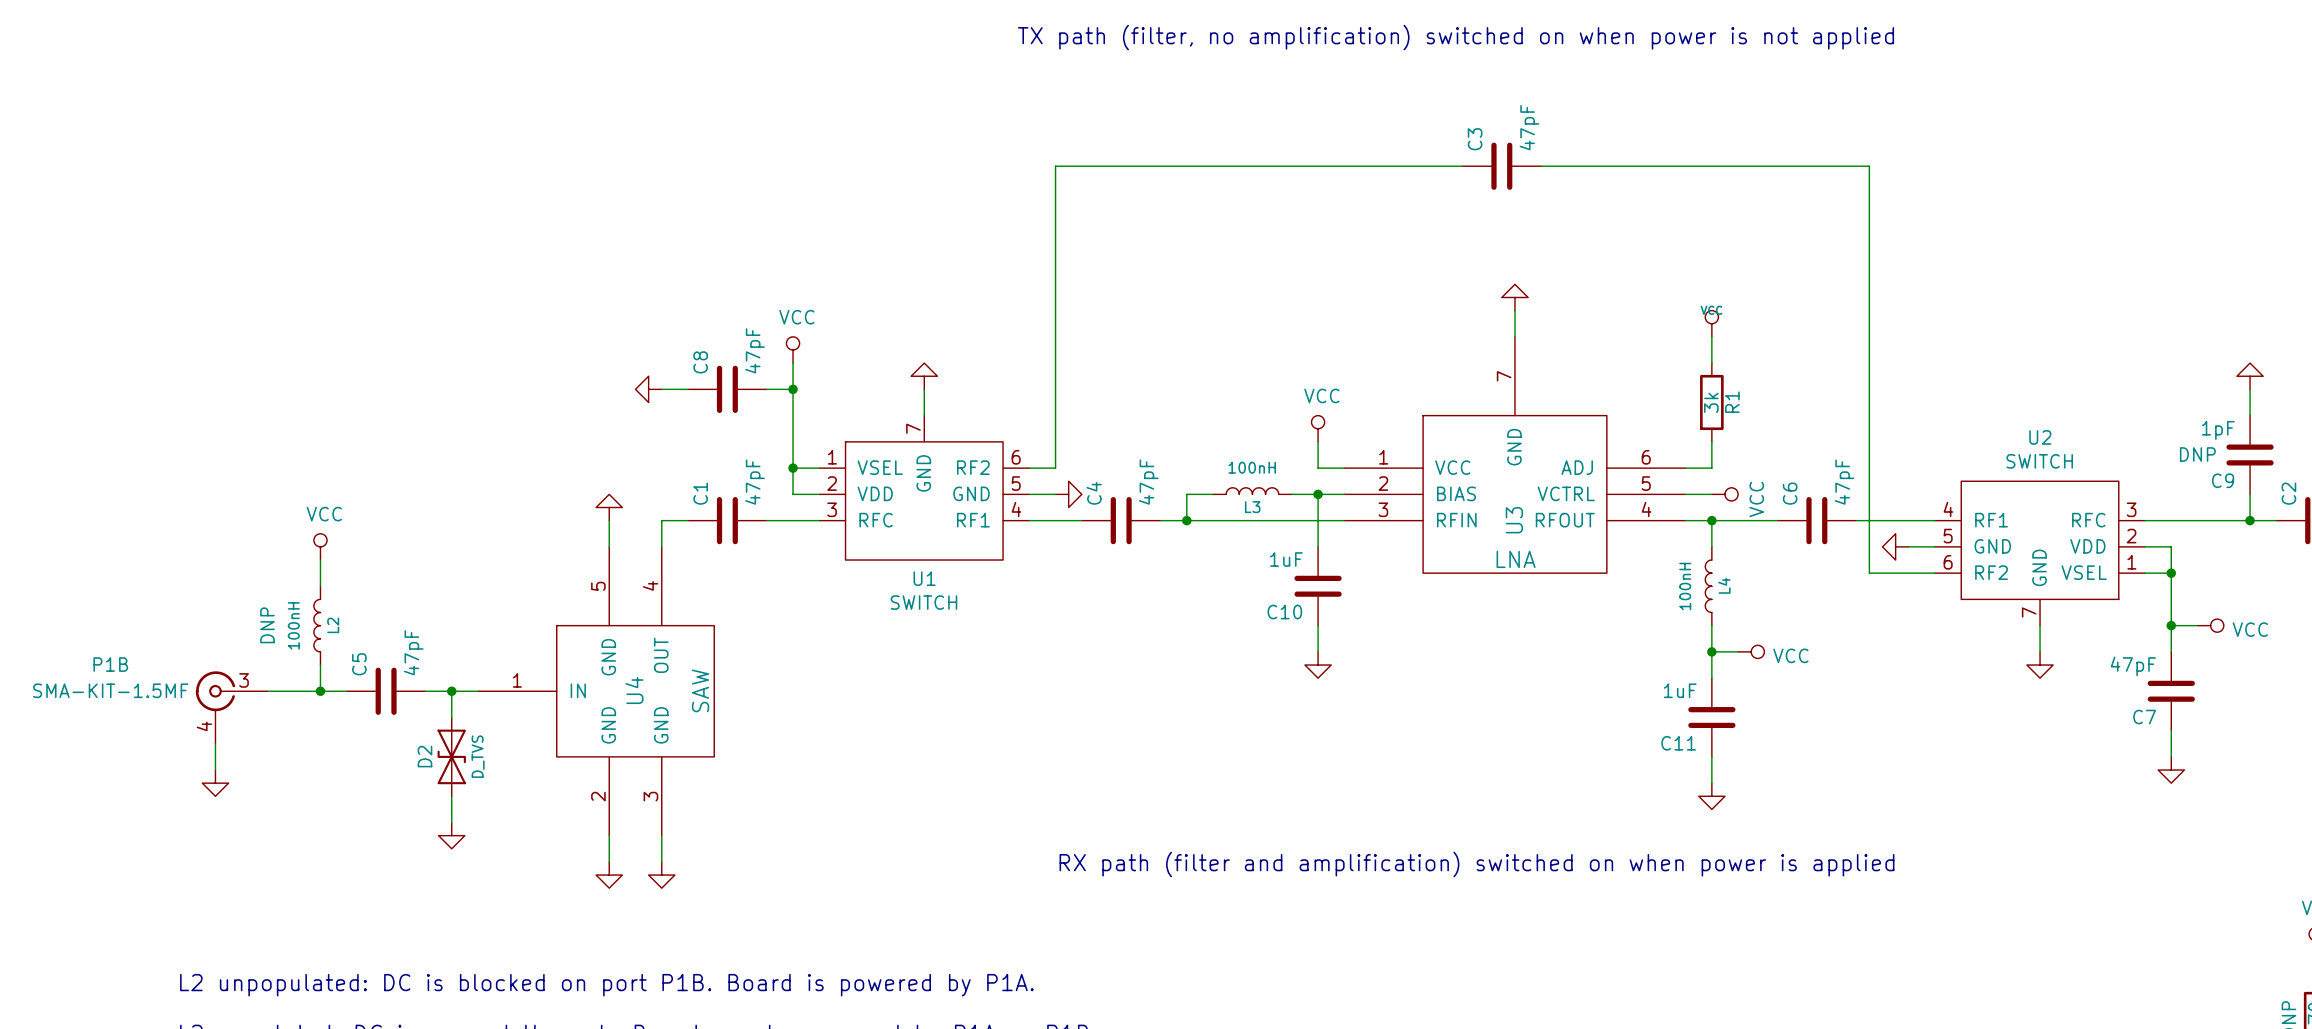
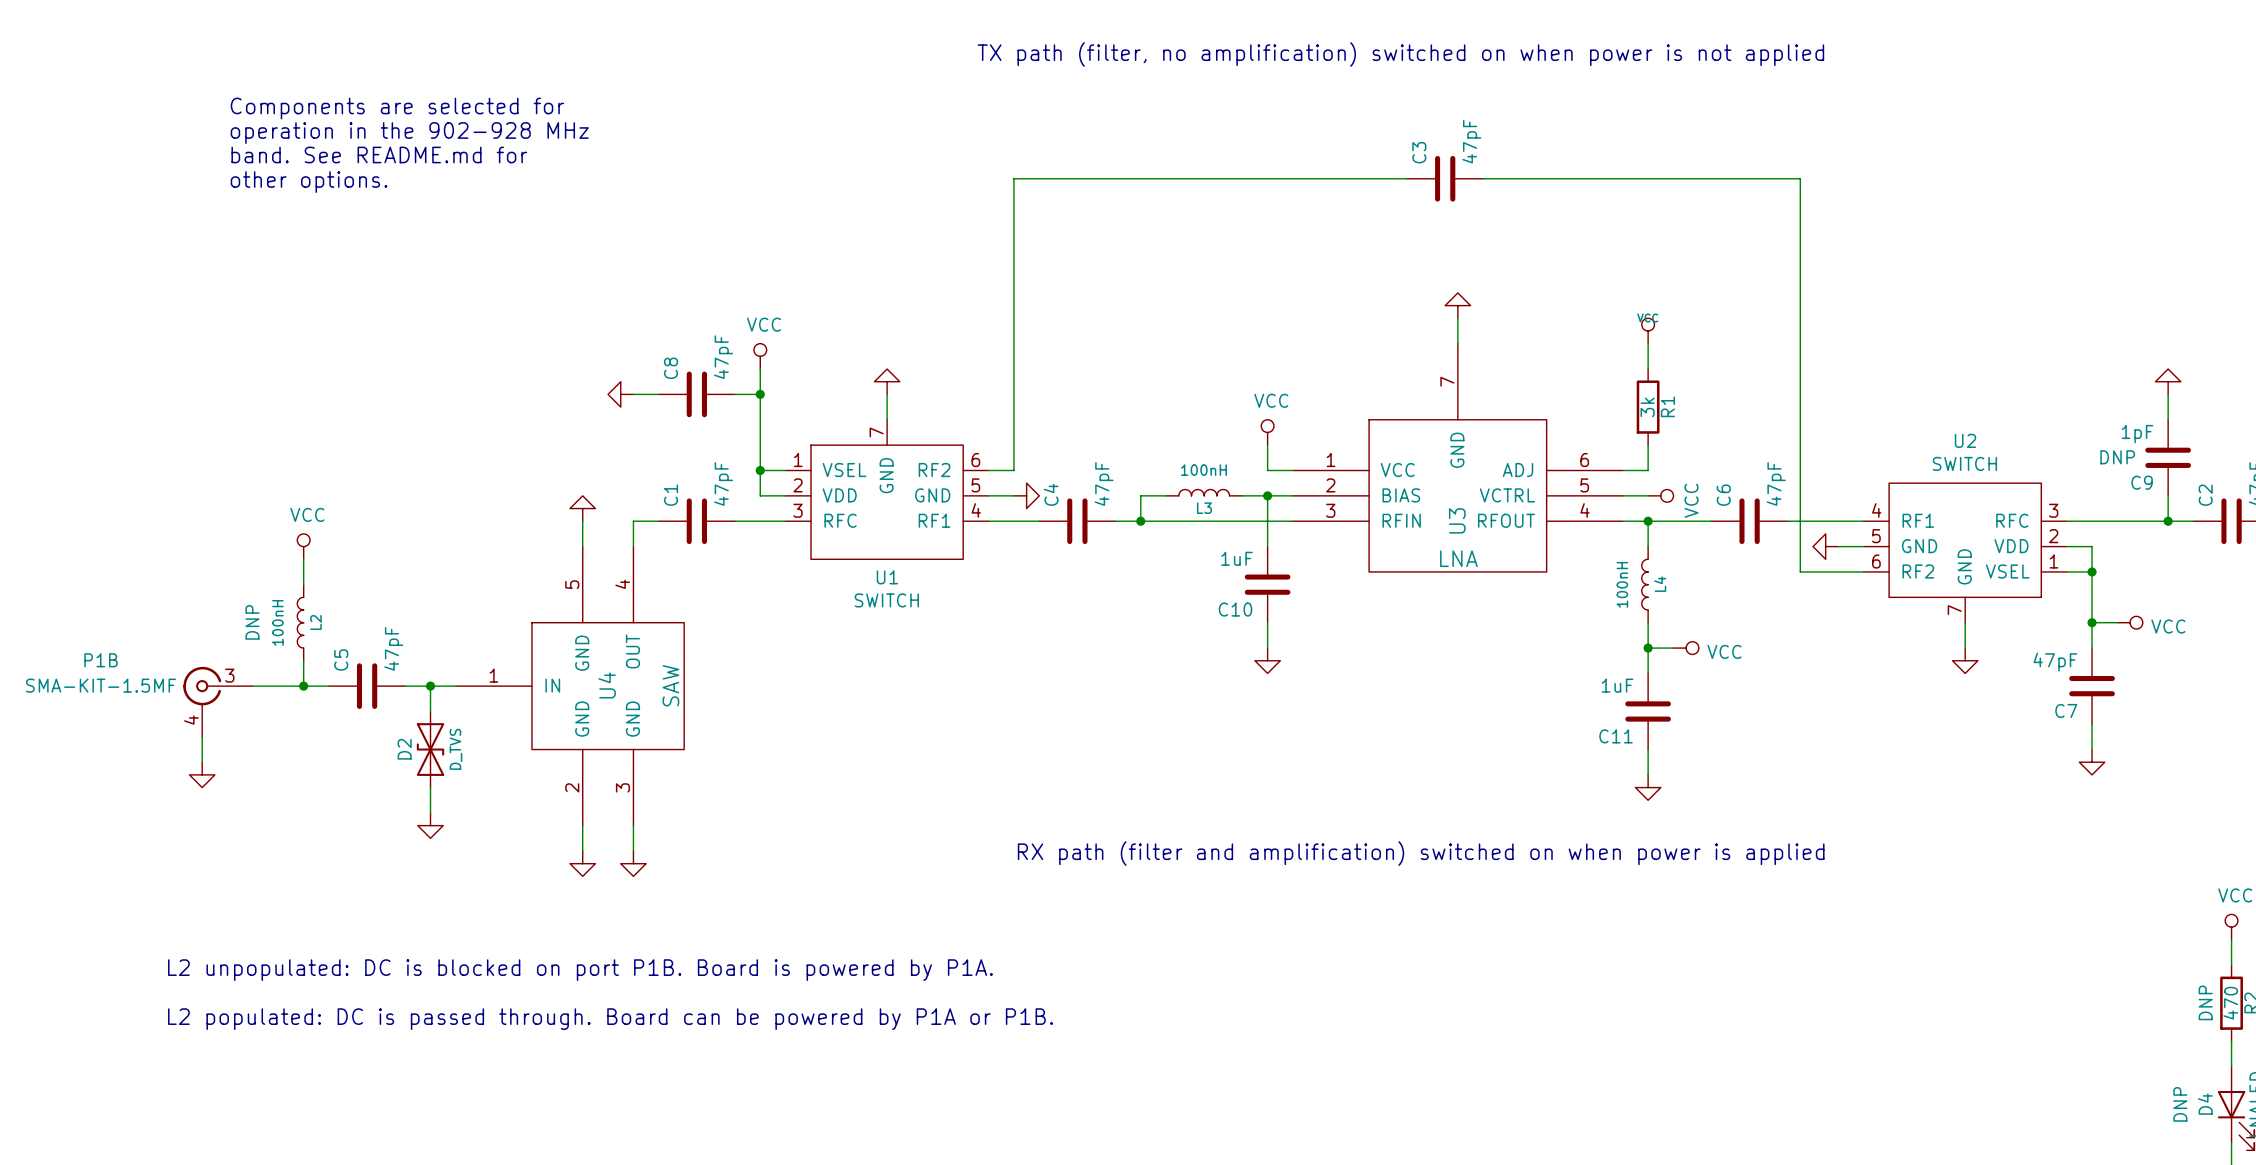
text: none -> Components are selected for (397, 108)
text: none -> operation in the 902-928 MHz (409, 133)
text: none -> band. See README.md for (379, 154)
text: none -> other options. (309, 182)

